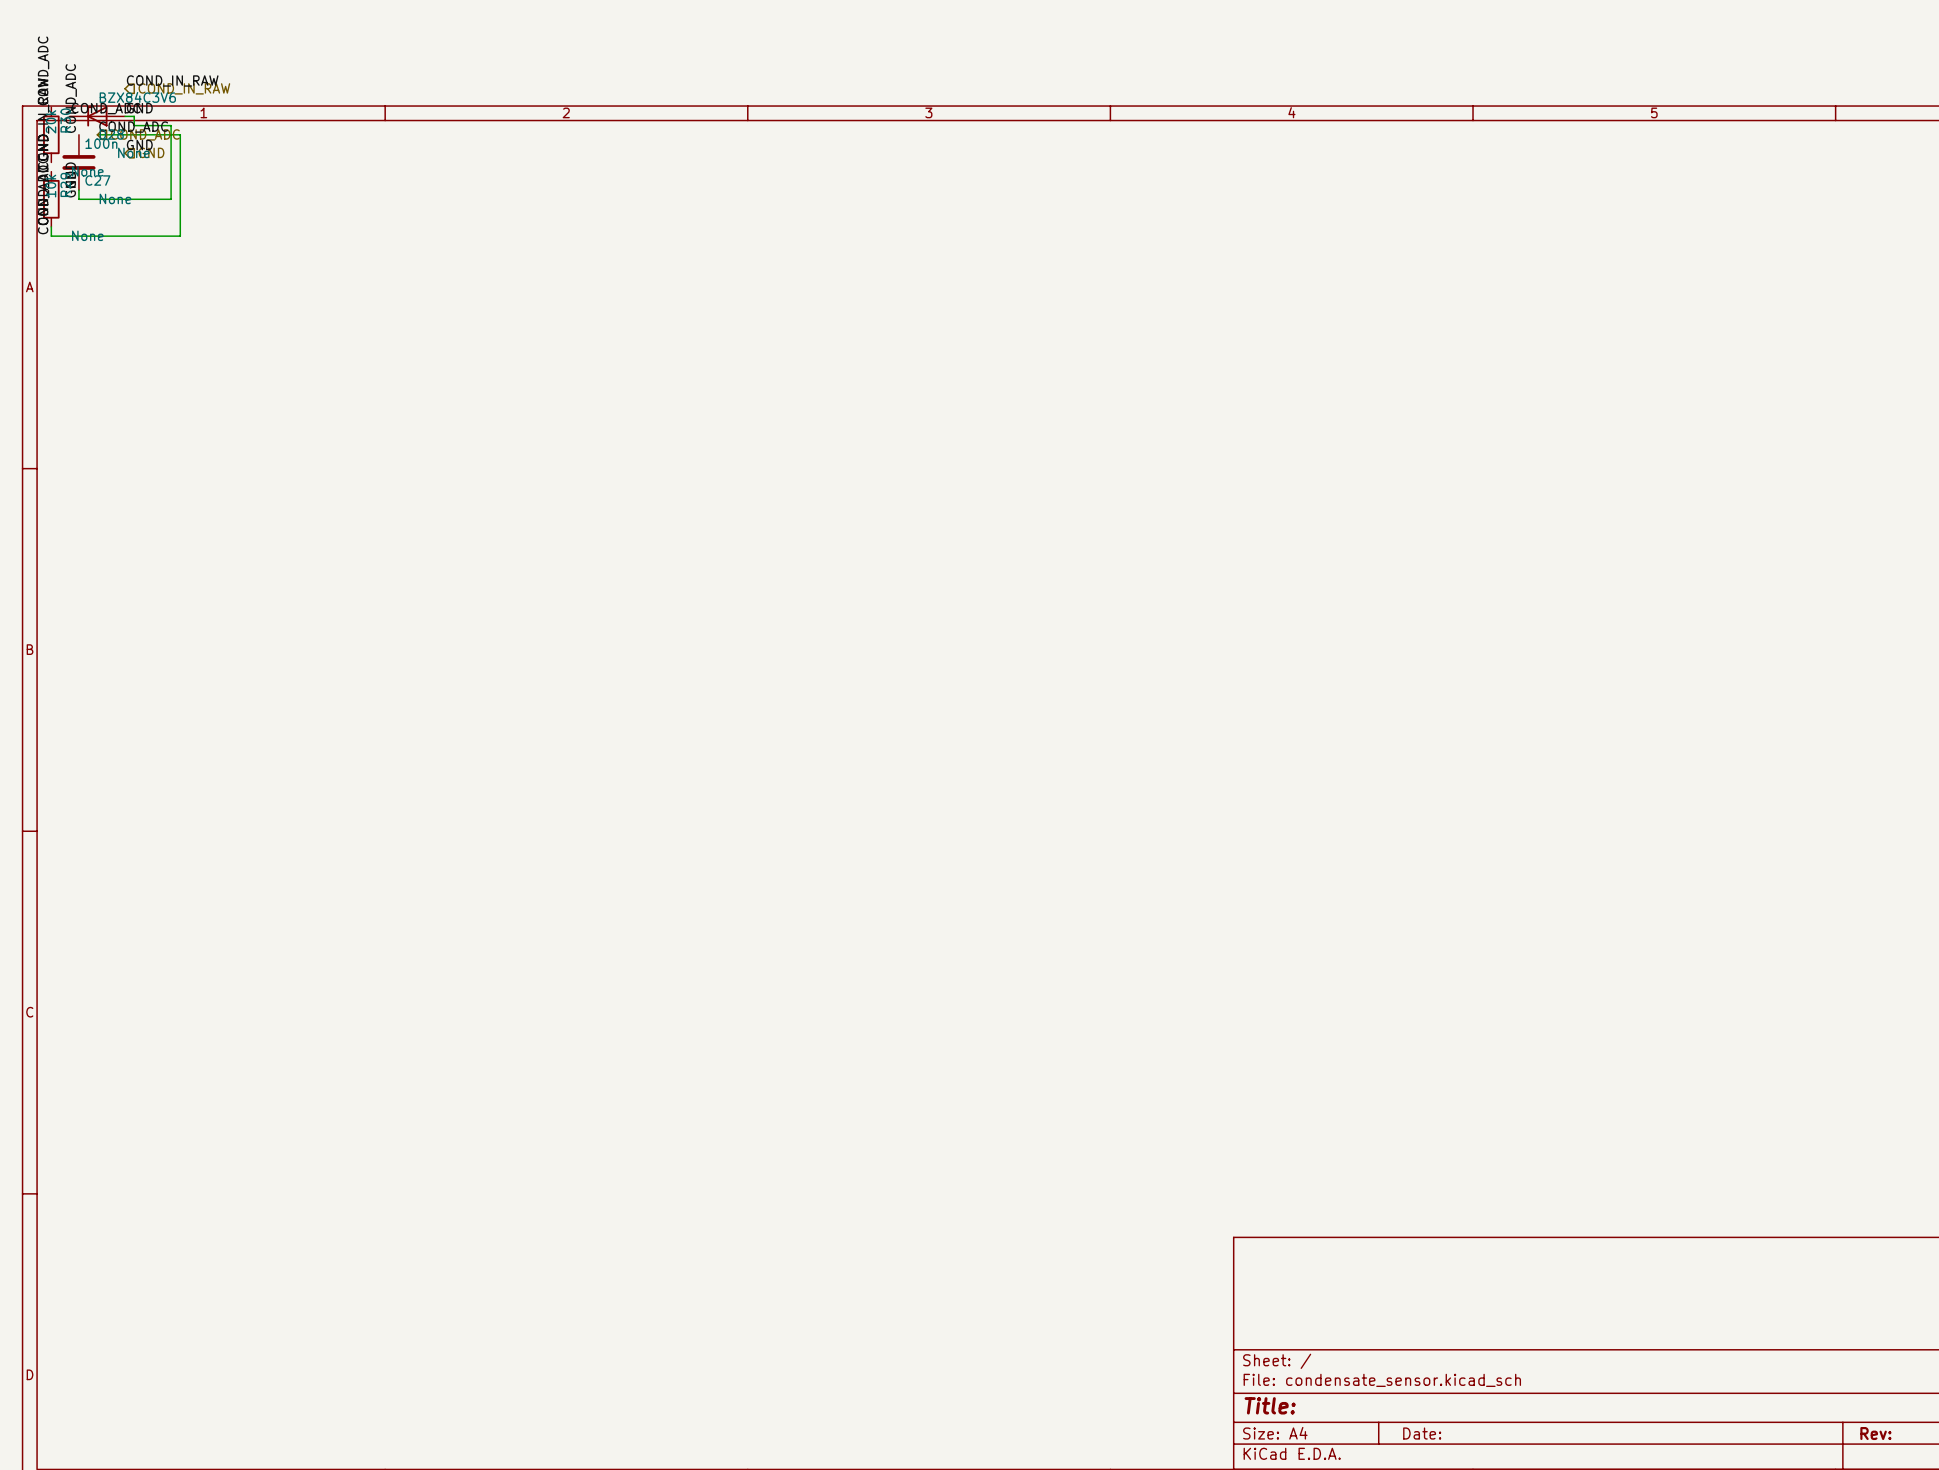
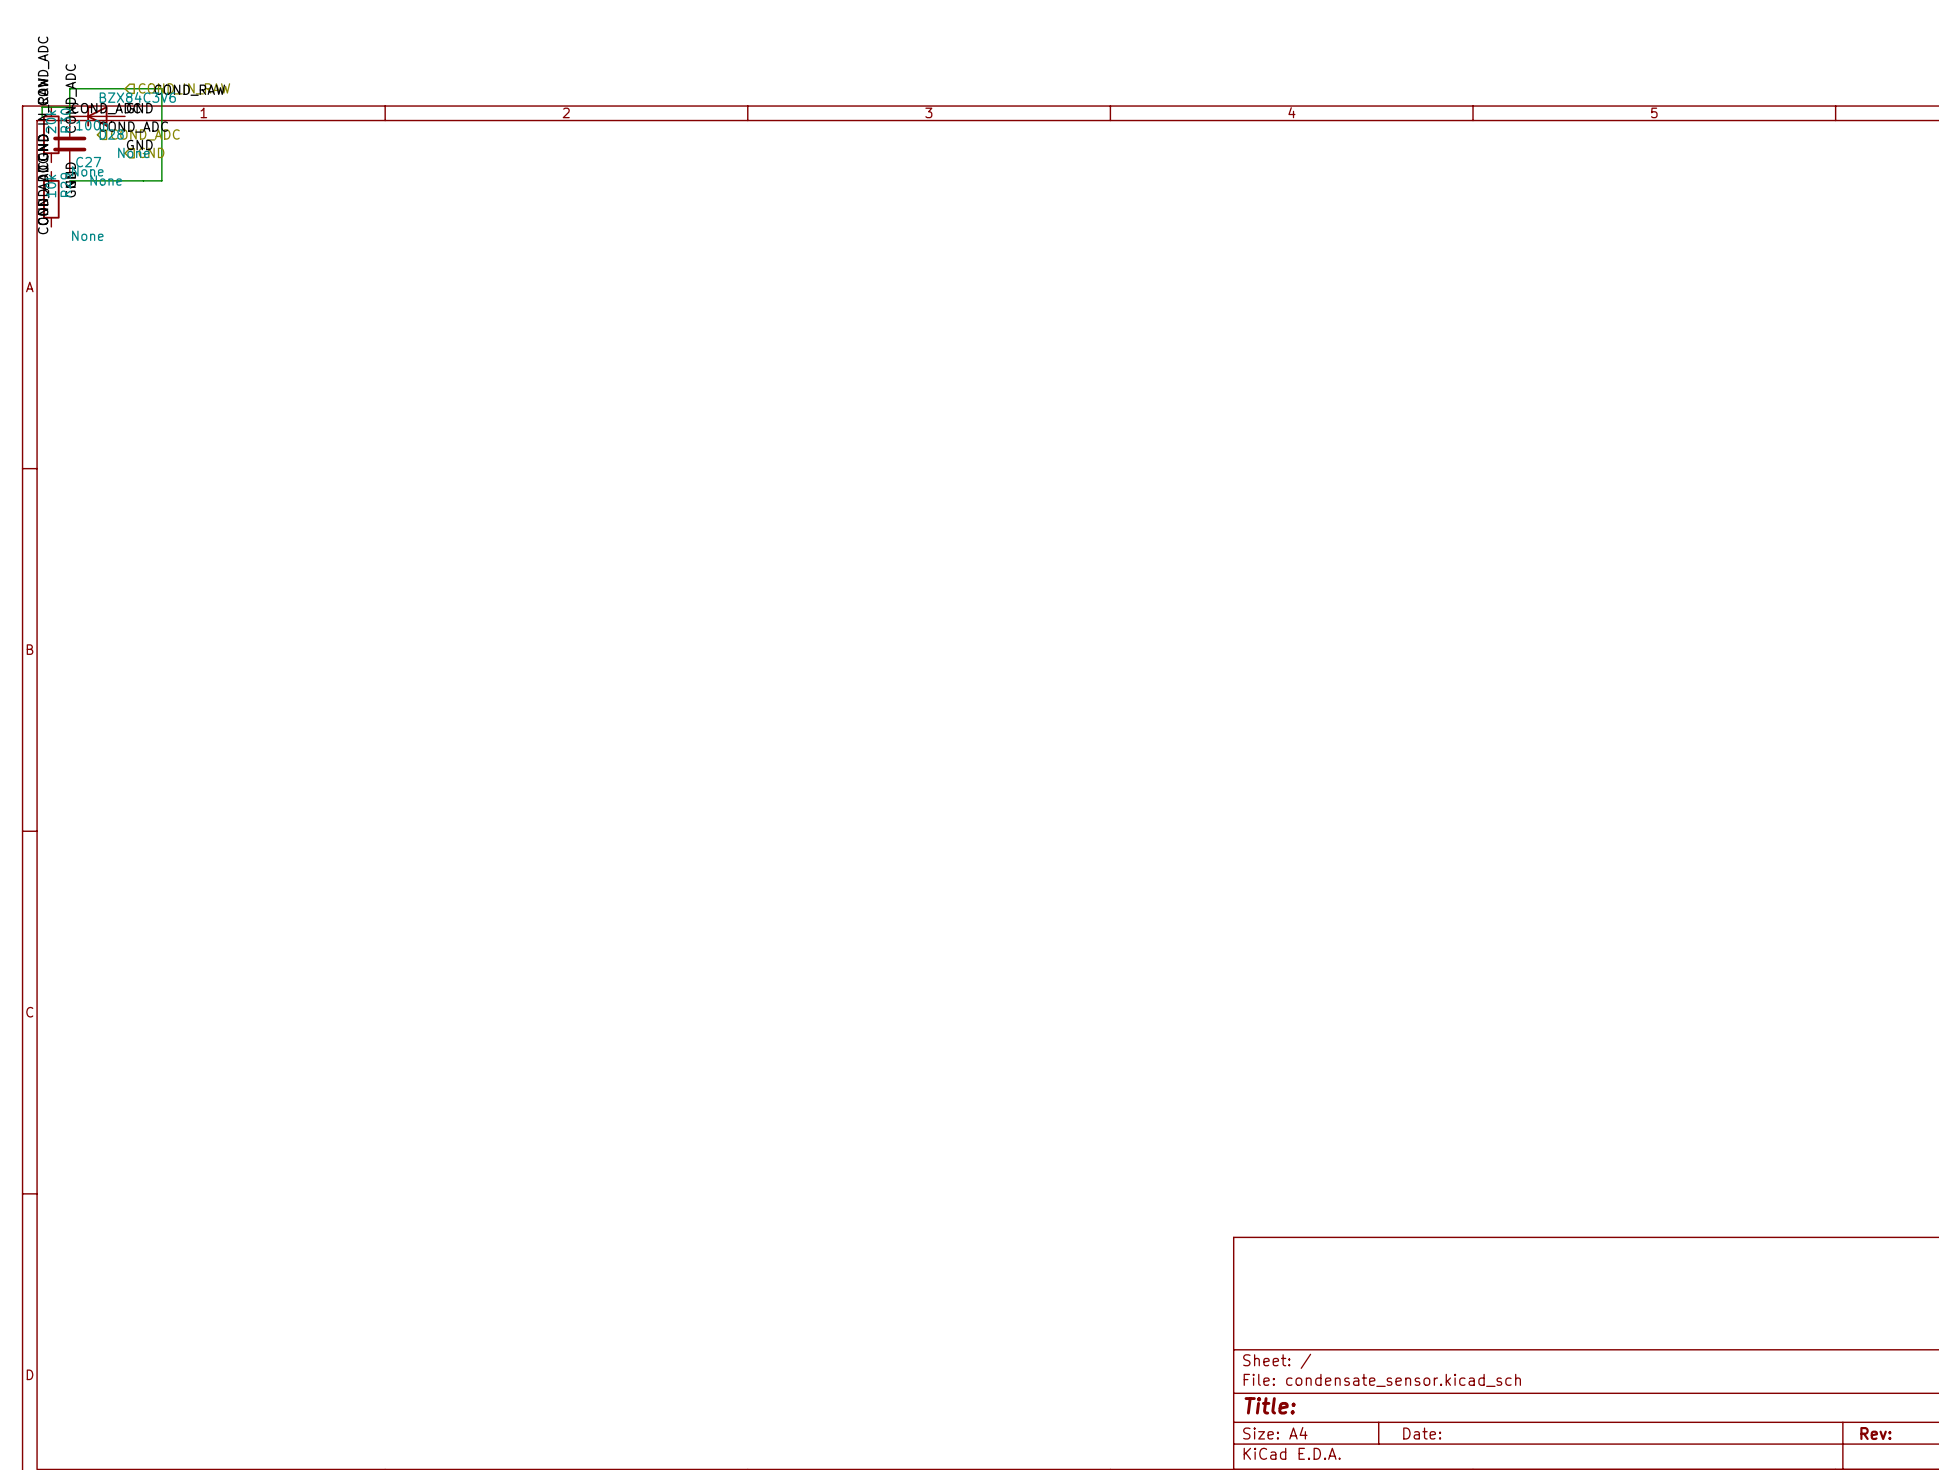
label: COND_IN_RAW (172, 80) -> COND_RAW (189, 90)
wire: none -> (69, 107) (42, 107) (42, 116)
wire: none -> (69, 116) (69, 88) (161, 88) (161, 180) (69, 180)
wire: (125, 116) (134, 116) (134, 125) (171, 125) (171, 199) (78, 199) (78, 190) -> none
wire: (97, 134) (180, 134) (180, 236) (51, 236) (51, 226) -> none
C27 position: (78, 162) -> (69, 144)

